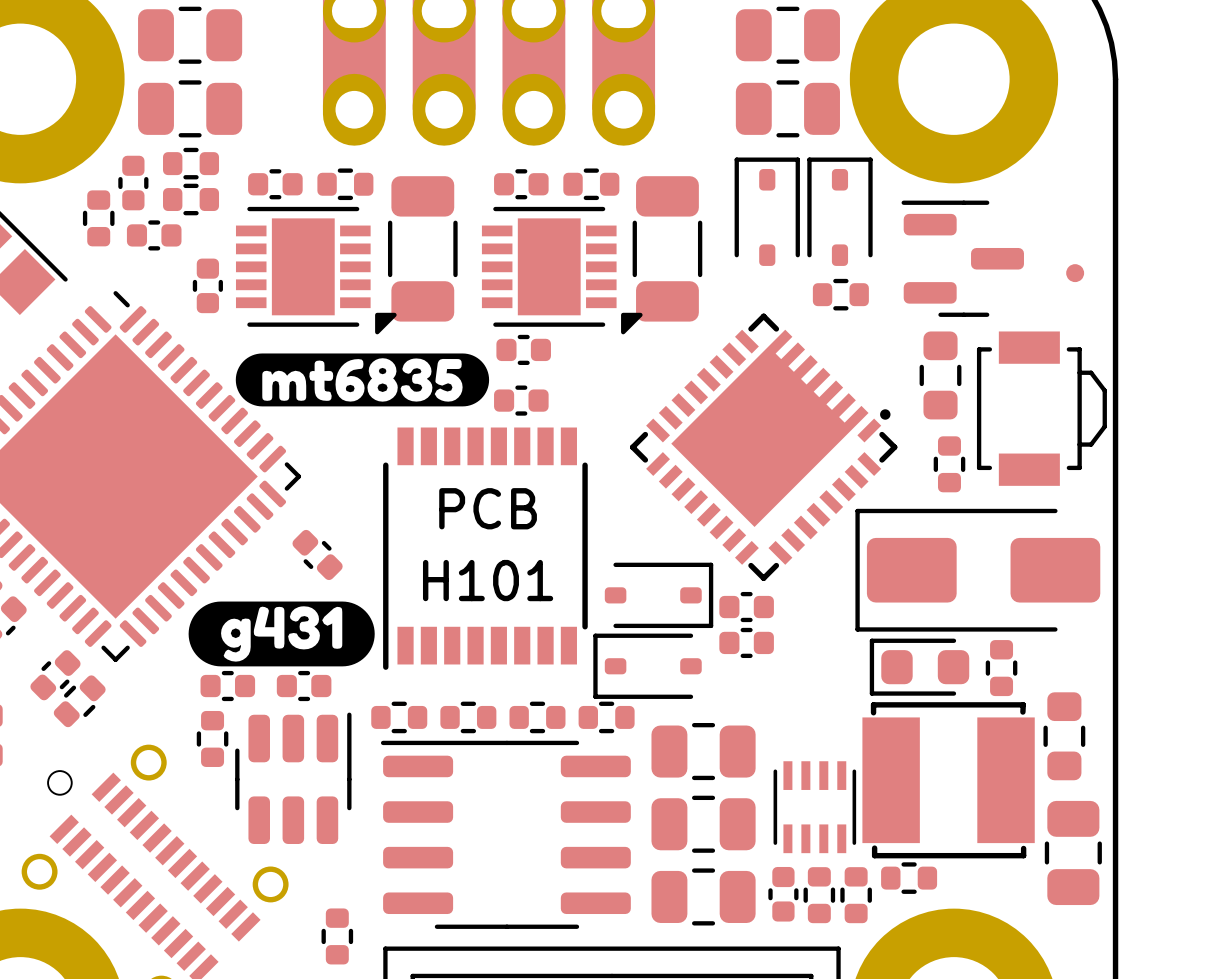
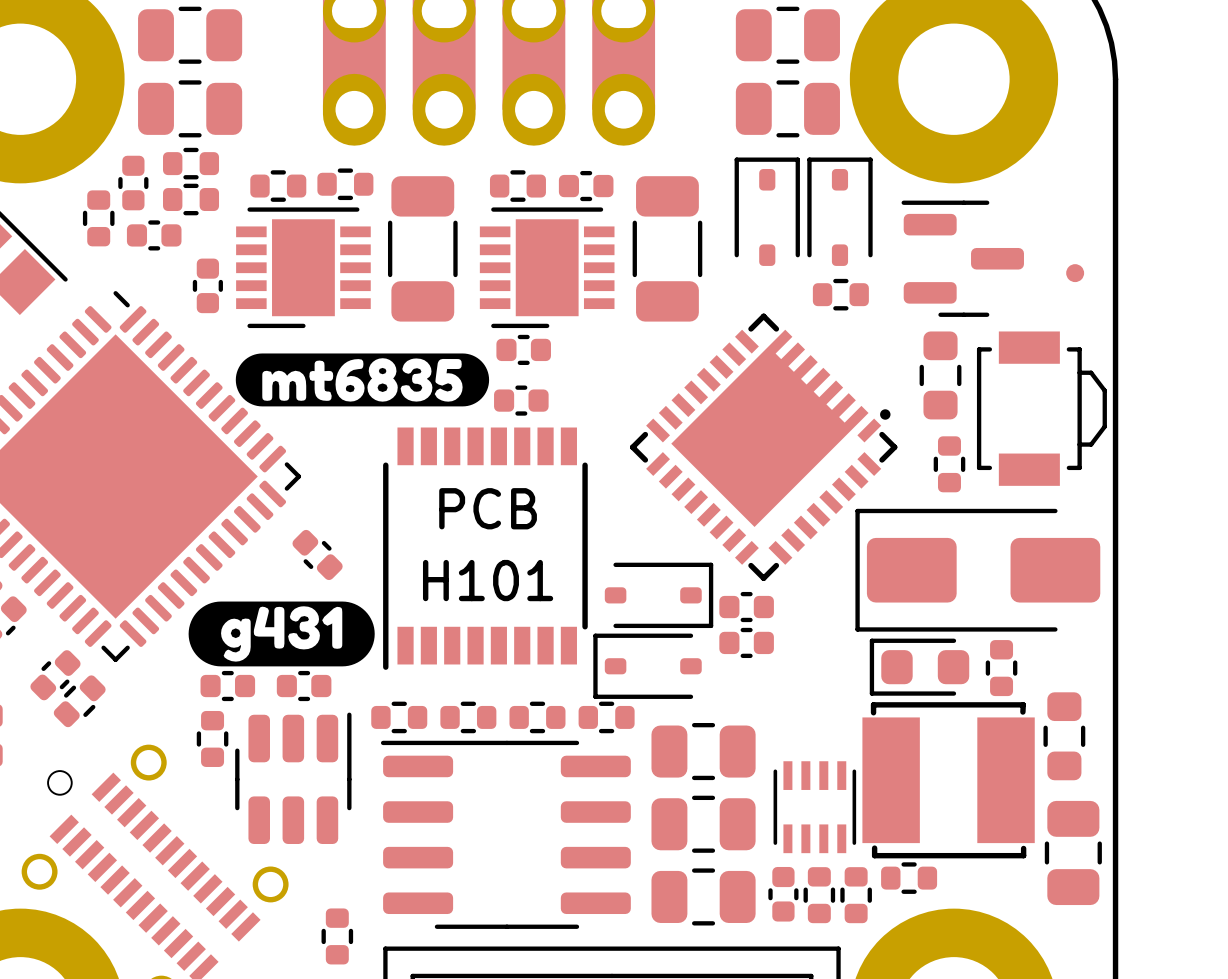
part footprint: [563, 168, 620, 201] -> [558, 170, 614, 202]
part footprint: [248, 169, 303, 200] -> [250, 170, 307, 202]
part footprint: [494, 169, 549, 200] -> [489, 170, 546, 202]
part footprint: [235, 206, 397, 335] -> [236, 207, 371, 329]
part footprint: [481, 206, 643, 335] -> [479, 207, 615, 329]

